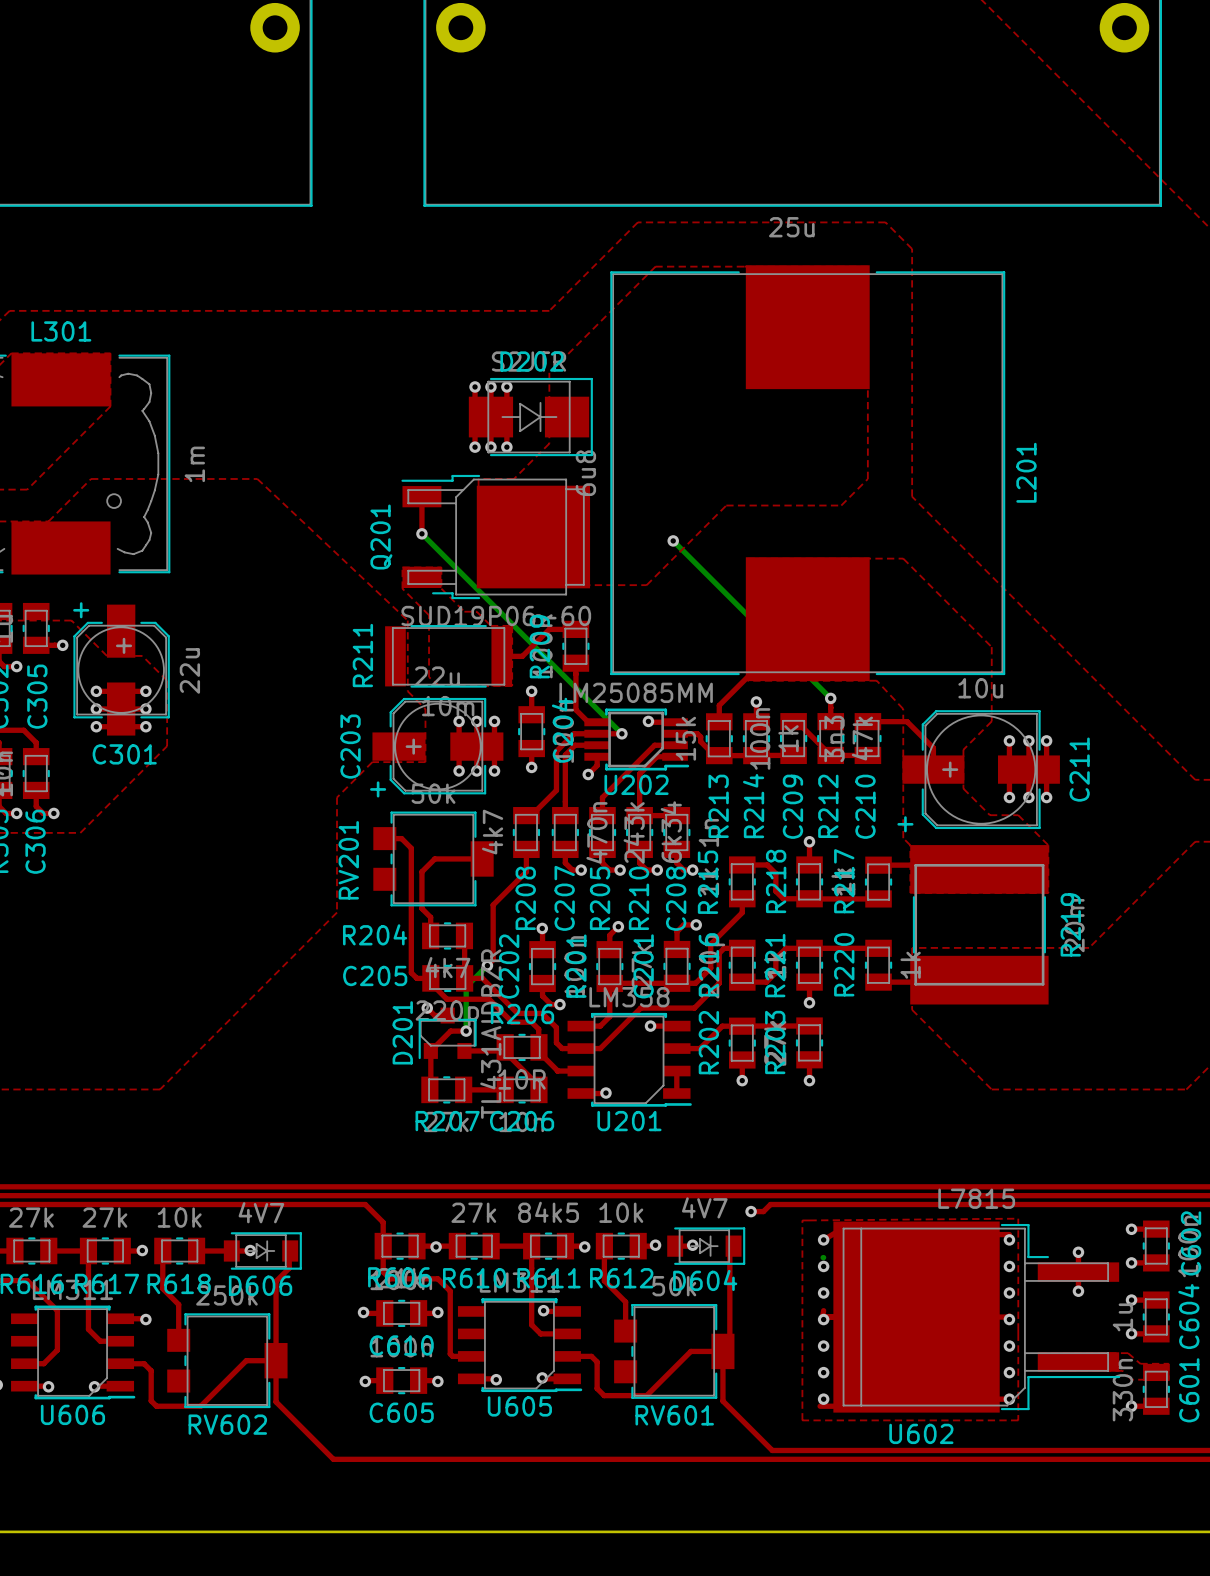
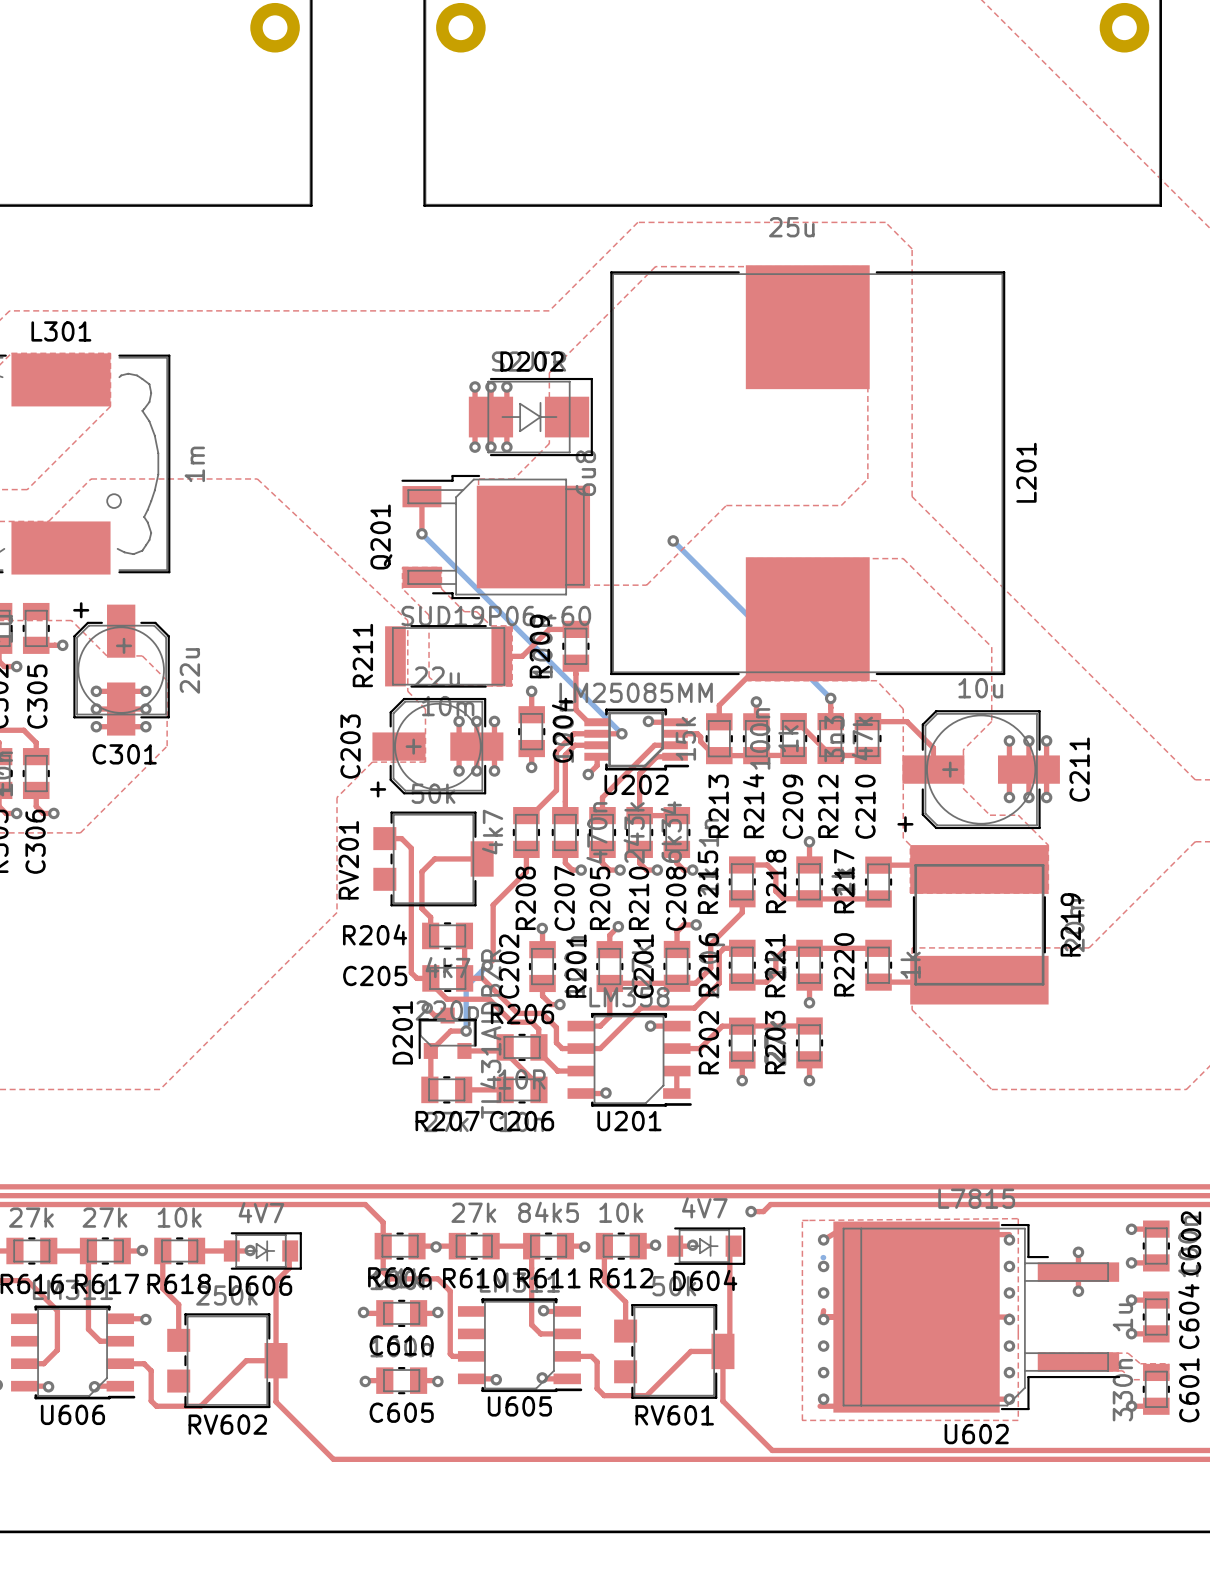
U602 name position: U602 (921, 1433) -> U602 (976, 1434)

